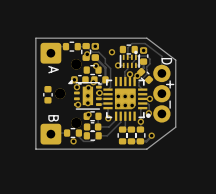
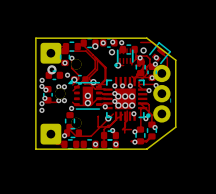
via: none -> (103, 42)
part: none -> (108, 42)
via: none -> (112, 42)
via: none -> (121, 42)
track: none -> (140, 42) (152, 42) (161, 51)
track: none -> (83, 45) (97, 59) (97, 69) (89, 79) (94, 84) (105, 84)
track: (77, 46) (86, 46) (92, 52) (98, 52) (105, 58) (105, 63) (110, 68) (110, 87) (108, 89) -> none
part footprint: [119, 50, 140, 69] -> [114, 48, 134, 68]
track: none -> (65, 51) (86, 51) (95, 60) (95, 68) (73, 90)
part rotation: 0° (86, 51) -> 90° clockwise (89, 43)
part: (95, 51) -> none
track: none -> (161, 51) (167, 58) (167, 70)
part: none -> (159, 53)
via: (87, 54) -> none
part position: (143, 56) -> (152, 72)
part: none -> (65, 57)
track: (131, 57) (127, 57) (127, 47) (132, 43) (145, 43) (161, 56) (161, 73) -> none
via: none -> (140, 57)
via: none -> (156, 57)
track: none -> (71, 58) (71, 68) (78, 75) (78, 78) (72, 85)
via: none -> (71, 58)
text: D (166, 61) -> none
via: none -> (65, 62)
via: none -> (155, 64)
via: (95, 65) -> none
track: (127, 65) (124, 71) (125, 81) -> none
part: none -> (140, 67)
via: none -> (51, 69)
text: A (53, 69) -> none
part: (92, 70) -> none
via: (129, 74) -> none
part: none -> (54, 75)
via: none -> (67, 75)
via: (137, 75) -> none
part: (145, 75) -> none
track: none -> (131, 76) (151, 77)
via: none -> (152, 77)
part: (99, 79) -> none
via: none -> (42, 80)
track: none -> (82, 81) (84, 83) (90, 83) (95, 89) (105, 89)
track: none -> (139, 84) (156, 85)
text: + (170, 84) -> none
via: none -> (114, 85)
via: none -> (122, 85)
via: none -> (130, 85)
via: none -> (156, 85)
via: none -> (41, 86)
via: none -> (58, 86)
via: none -> (64, 86)
via: (76, 87) -> none
via: (88, 87) -> none
via: none -> (45, 89)
via: none -> (149, 90)
via: (99, 92) -> none
via: none -> (114, 93)
via: none -> (44, 98)
track: none -> (105, 98) (97, 98) (90, 105) (75, 105) (72, 102)
via: (149, 98) -> none
via: none -> (58, 100)
via: none -> (64, 100)
via: none -> (114, 101)
track: none -> (50, 102) (57, 102)
track: none -> (139, 102) (151, 114) (151, 124)
via: none -> (41, 103)
via: (78, 104) -> none
via: none -> (105, 106)
via: none -> (71, 108)
via: none -> (41, 110)
track: none -> (127, 111) (124, 132)
track: none -> (113, 113) (91, 136) (76, 136)
via: none -> (133, 113)
via: (148, 113) -> none
via: (88, 114) -> none
track: none -> (122, 114) (104, 129) (104, 144)
part: (92, 116) -> none
track: (120, 116) (120, 122) (107, 135) (98, 135) (93, 141) (83, 141) (78, 136) (78, 133) -> none
text: B (53, 118) -> none
via: none -> (145, 118)
part: none -> (70, 121)
via: (140, 121) -> none
track: none -> (70, 126) (70, 130) (75, 135)
part: (92, 126) -> none
via: none -> (155, 127)
via: none -> (112, 130)
part: none -> (151, 130)
via: none -> (134, 131)
via: none -> (64, 135)
part: (92, 135) -> none
part: none -> (109, 135)
part: (122, 135) -> none
part: (131, 135) -> none
via: (151, 135) -> none
via: (73, 141) -> none
via: none -> (134, 142)
track: none -> (56, 144) (64, 144)
part: none -> (70, 144)
part: none -> (89, 144)
via: none -> (95, 144)
part: none -> (109, 144)
via: none -> (115, 144)

